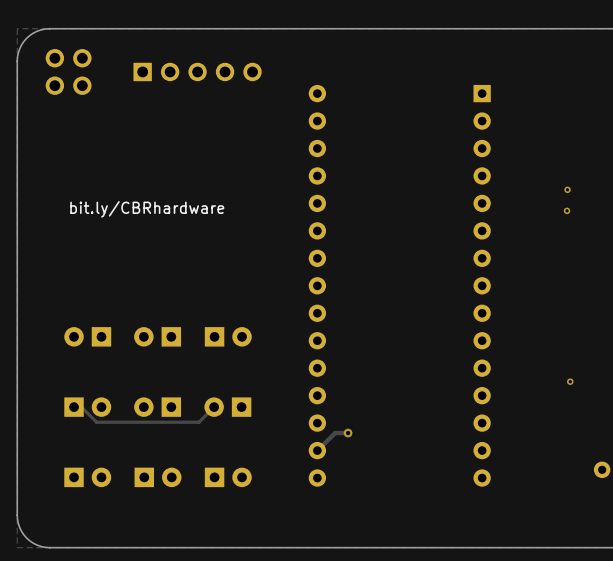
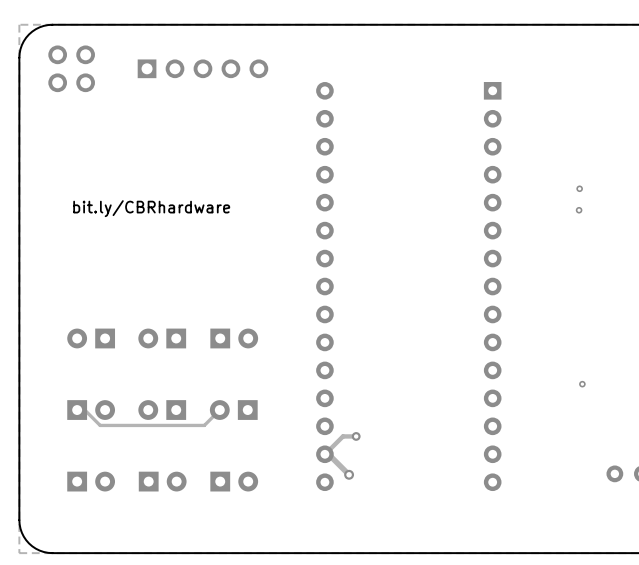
track: none -> (324, 454) (328, 454) (349, 474)
via: none -> (349, 474)

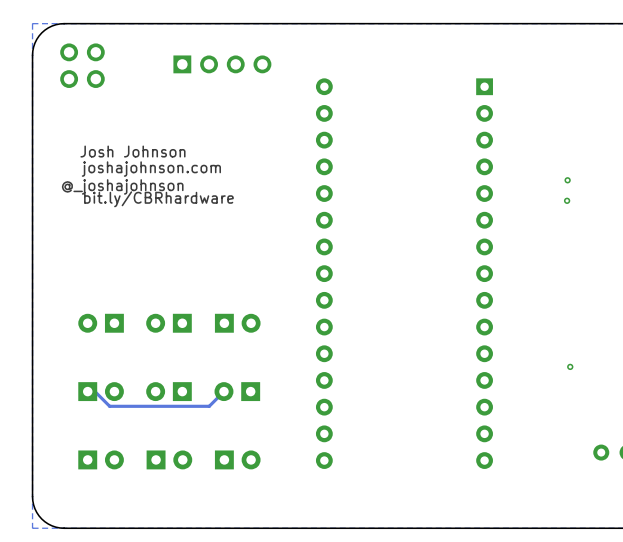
part: none -> (222, 64)
part: (202, 68) -> none
drawing: none -> [61, 145, 222, 195]
track: (356, 436) (342, 436) (325, 454) -> none
via: (356, 436) -> none
track: (324, 454) (328, 454) (349, 474) -> none
via: (349, 474) -> none

